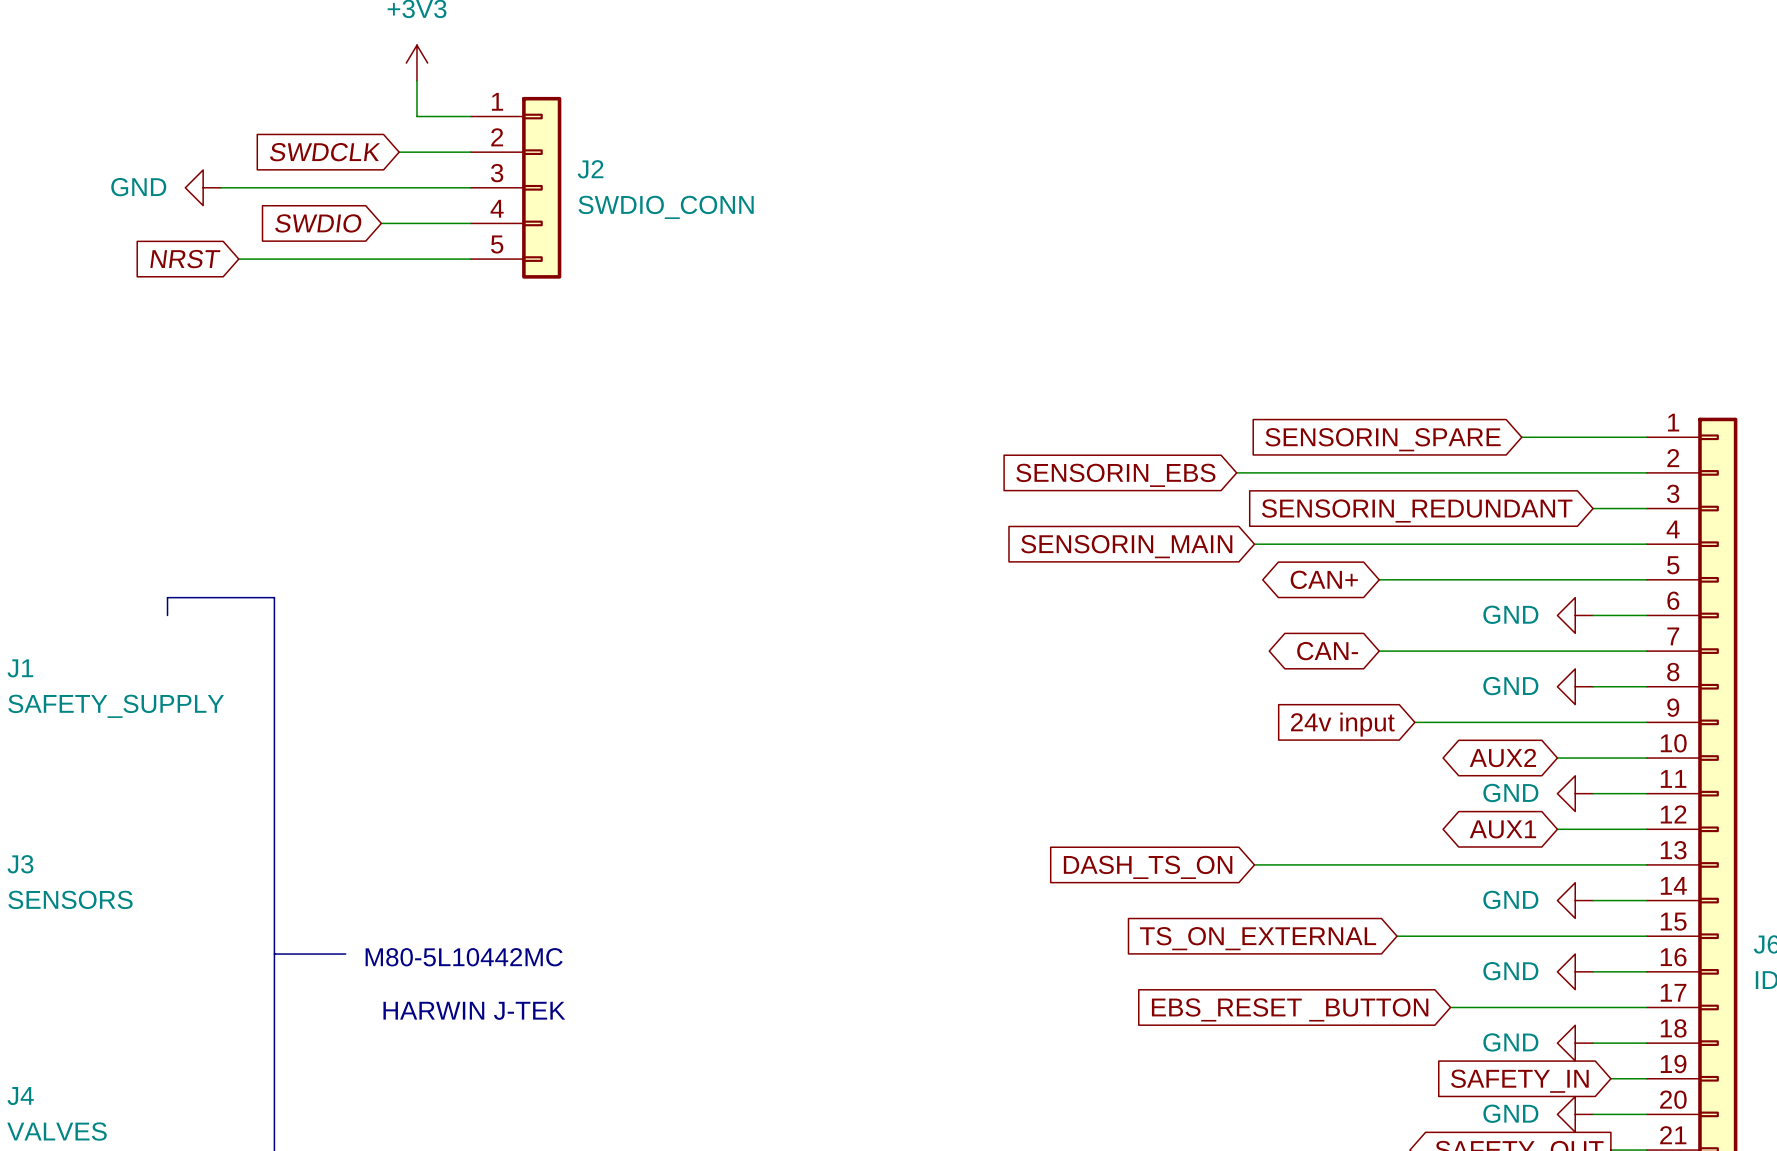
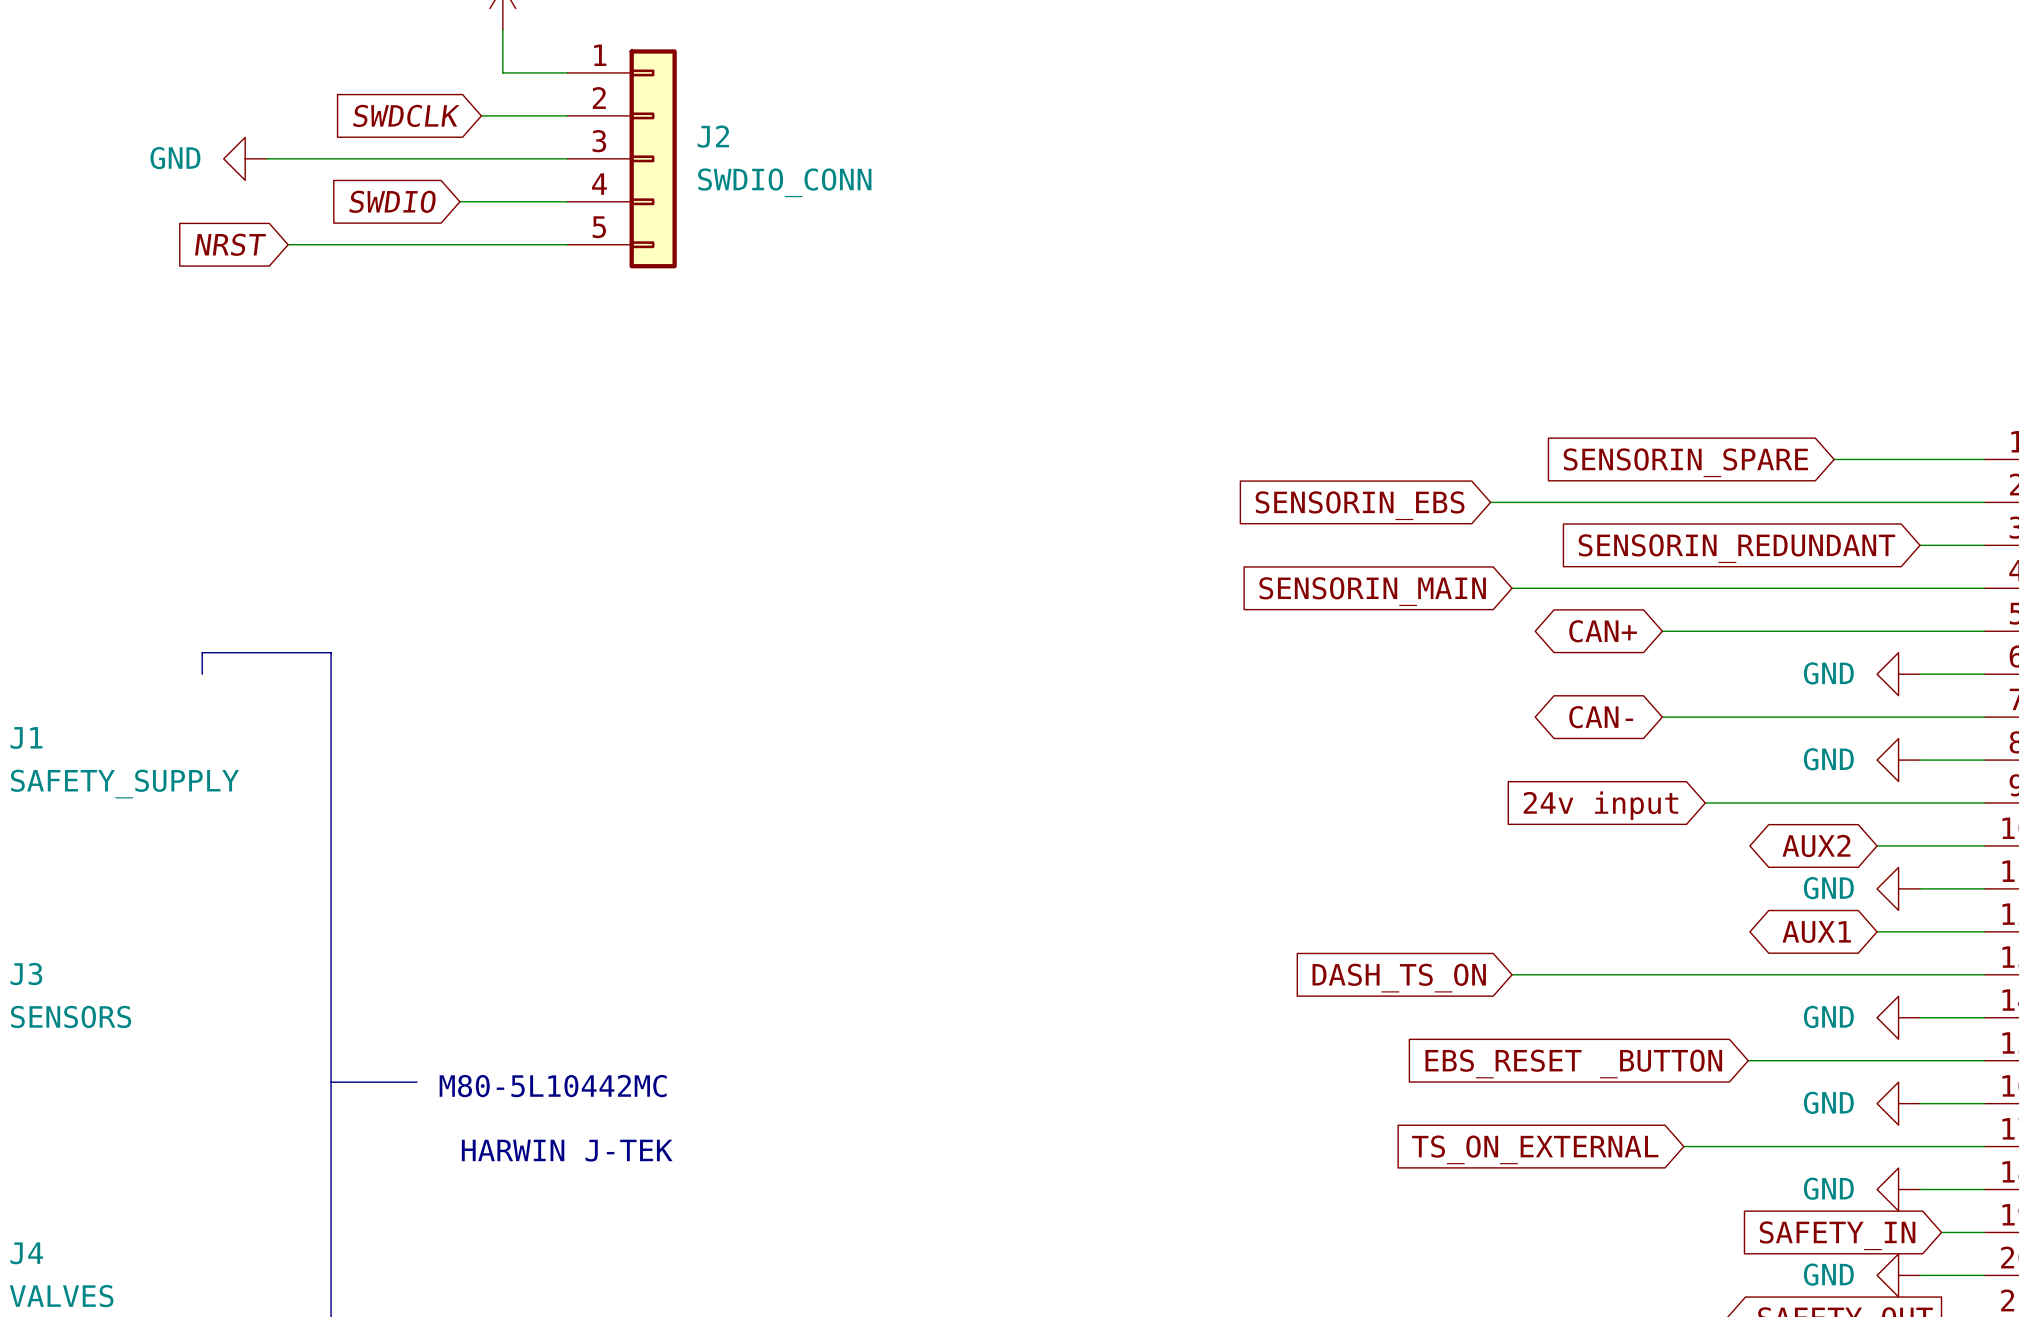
wire: (1397, 936) (1450, 936) -> (1683, 1146) (1748, 1146)
global label position: TS_ON_EXTERNAL (1258, 938) -> TS_ON_EXTERNAL (1535, 1149)
global label position: EBS_RESET _BUTTON (1290, 1009) -> EBS_RESET _BUTTON (1573, 1063)

